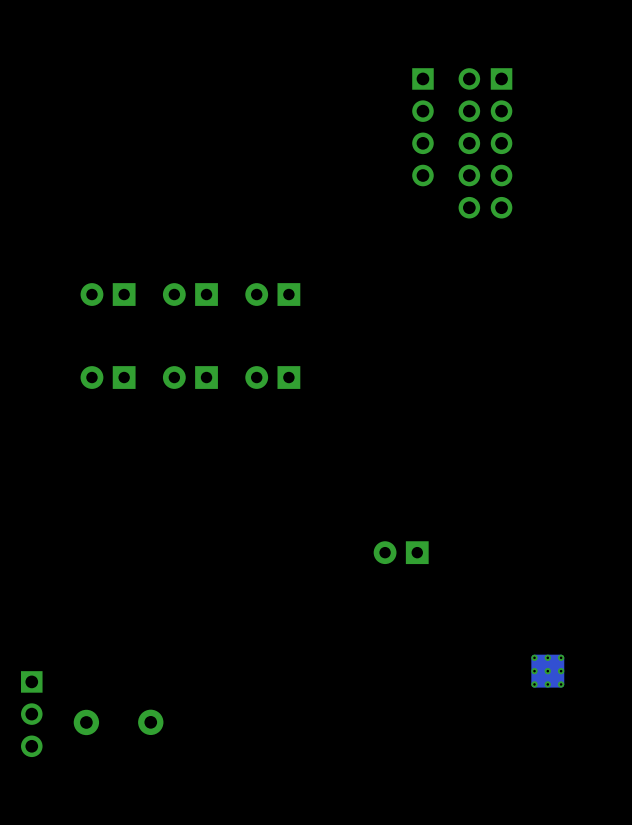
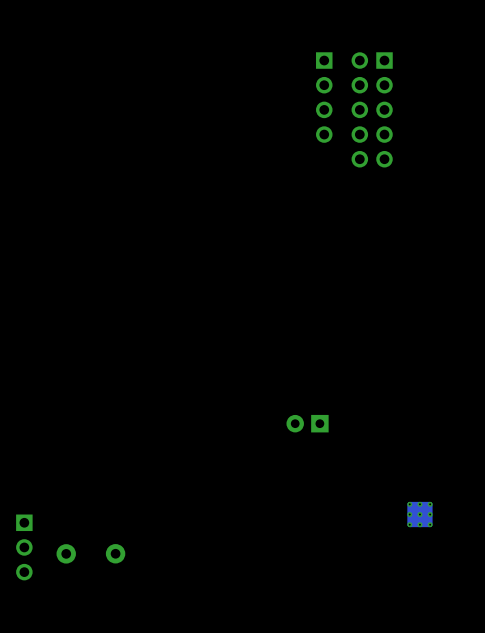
part: (108, 294) -> none
part: (190, 294) -> none
part: (272, 294) -> none
part: (108, 377) -> none
part: (190, 377) -> none
part: (272, 377) -> none

